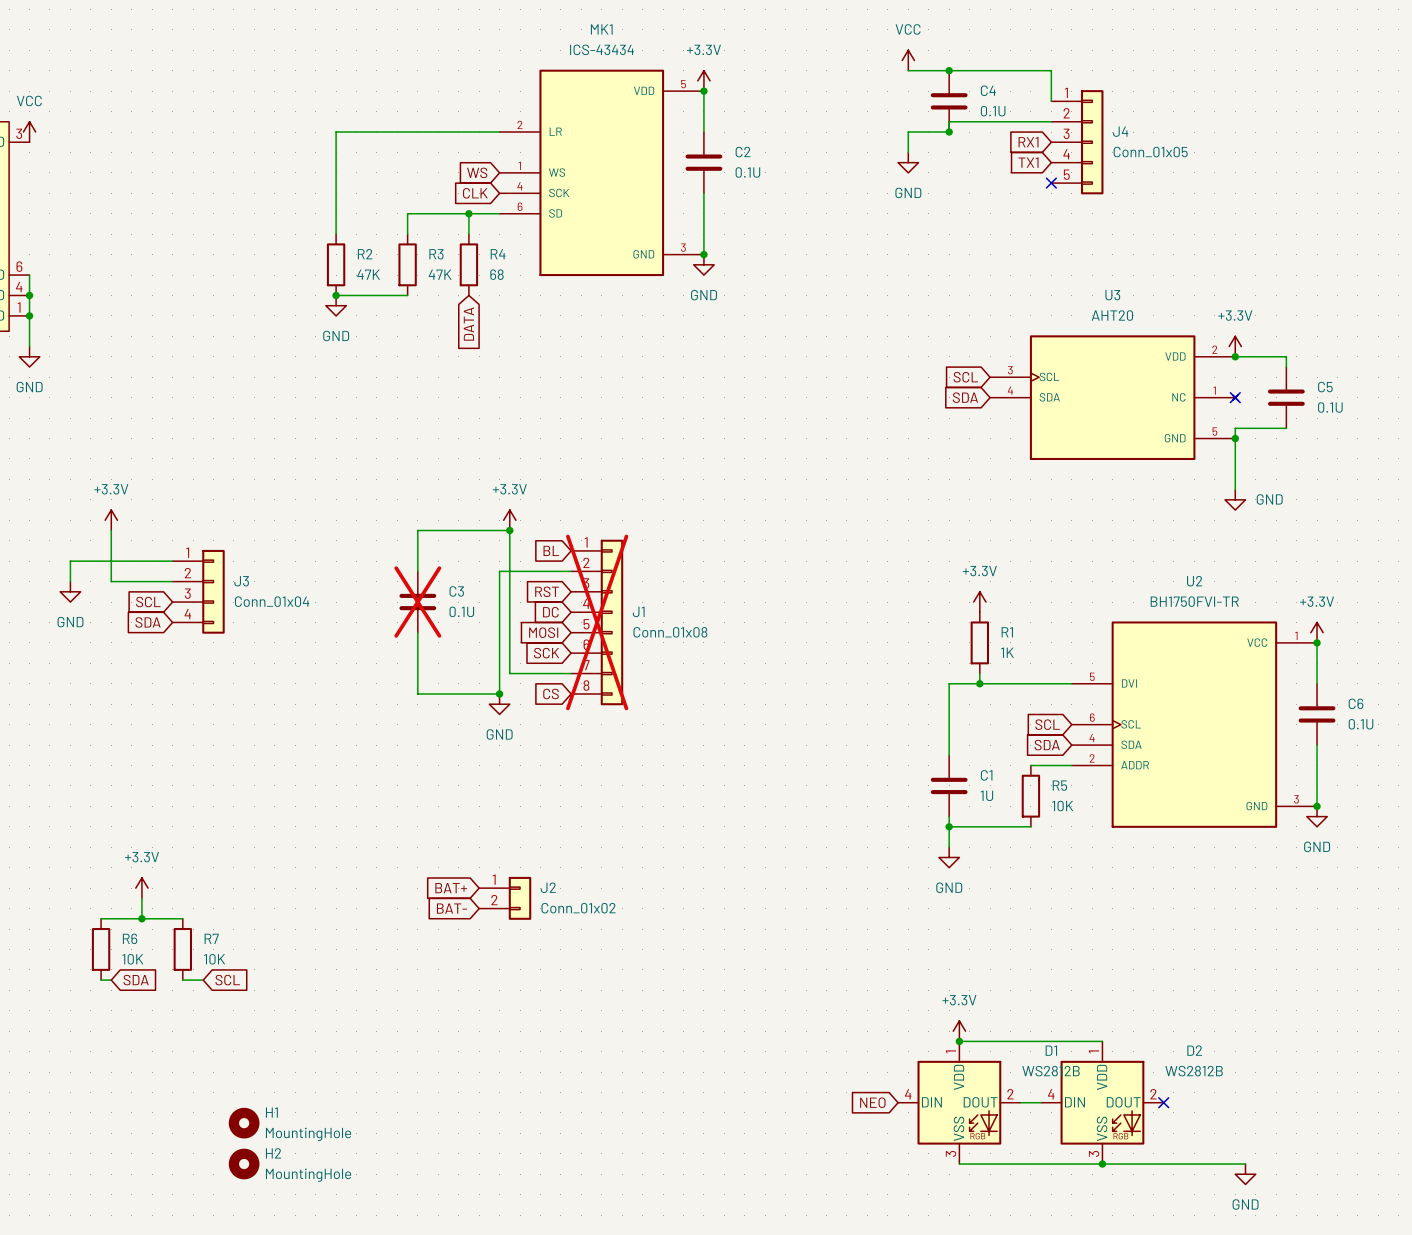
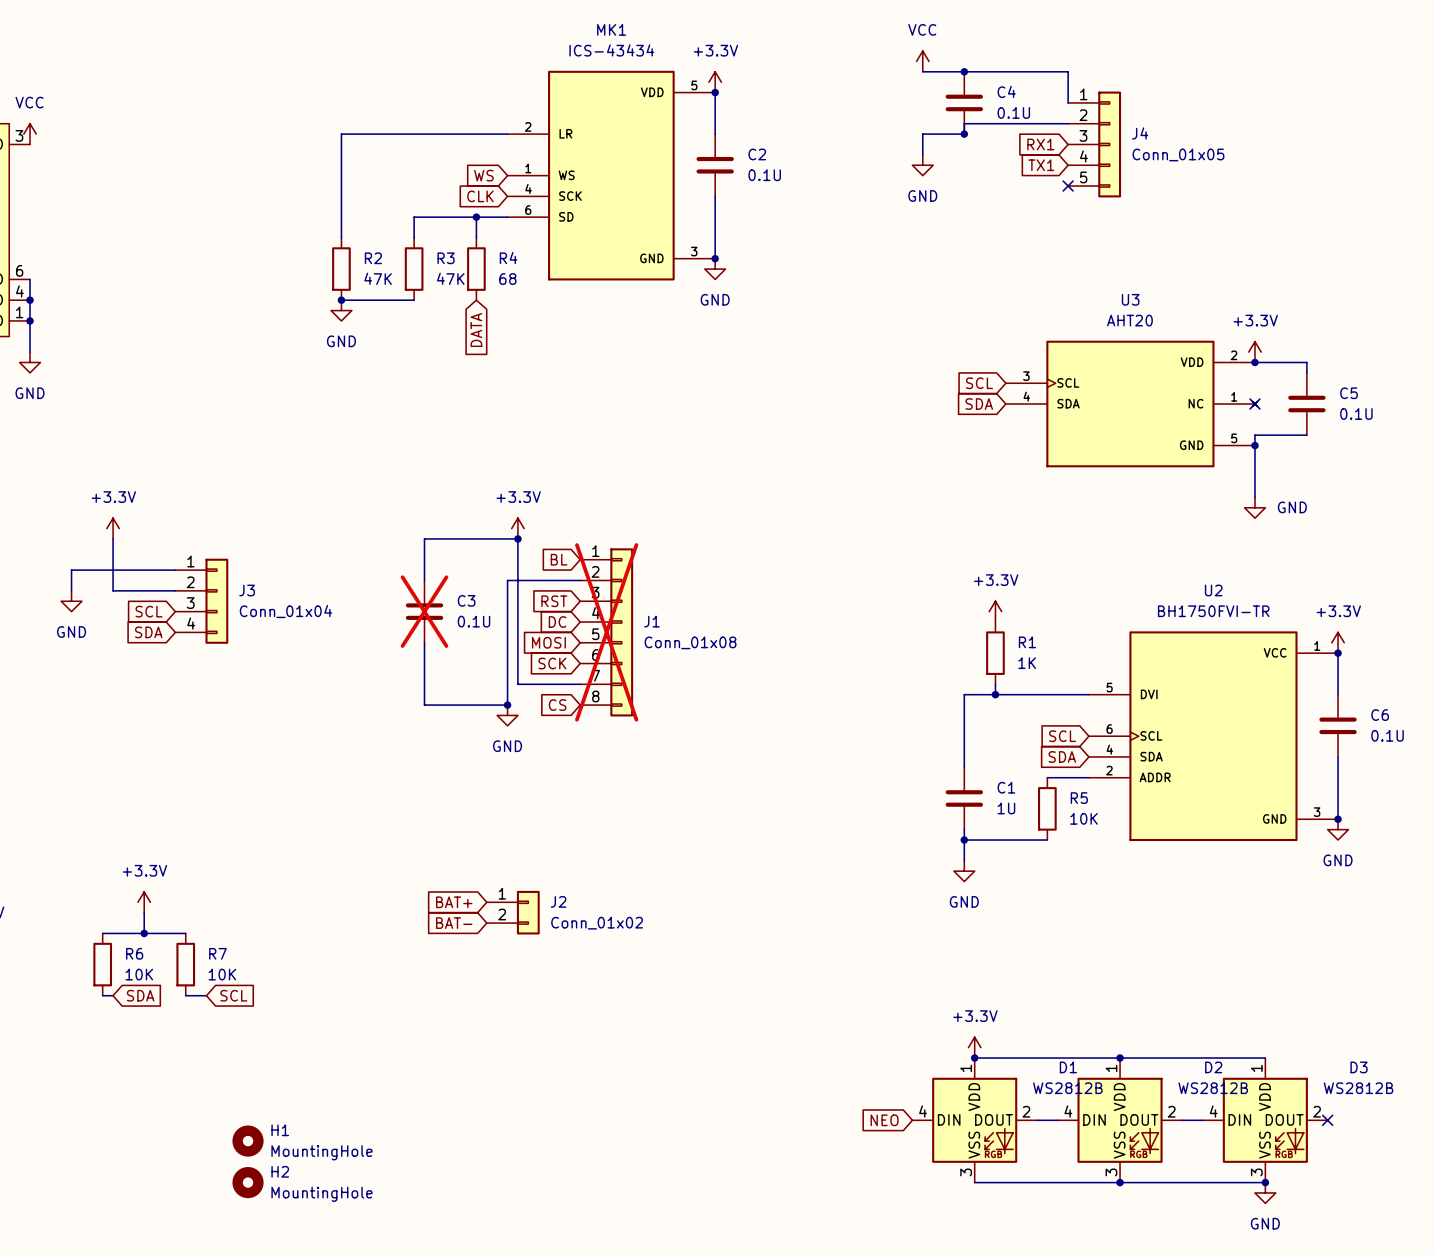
wire: none -> (1120, 1058) (1265, 1058)
junction: none -> (1120, 1058)
wire: none -> (1182, 1120) (1203, 1120)
no-connect mark: (1163, 1102) -> none
D3: none -> WS2812B (1265, 1120)
no-connect mark: none -> (1327, 1120)
junction: none -> (1265, 1182)

